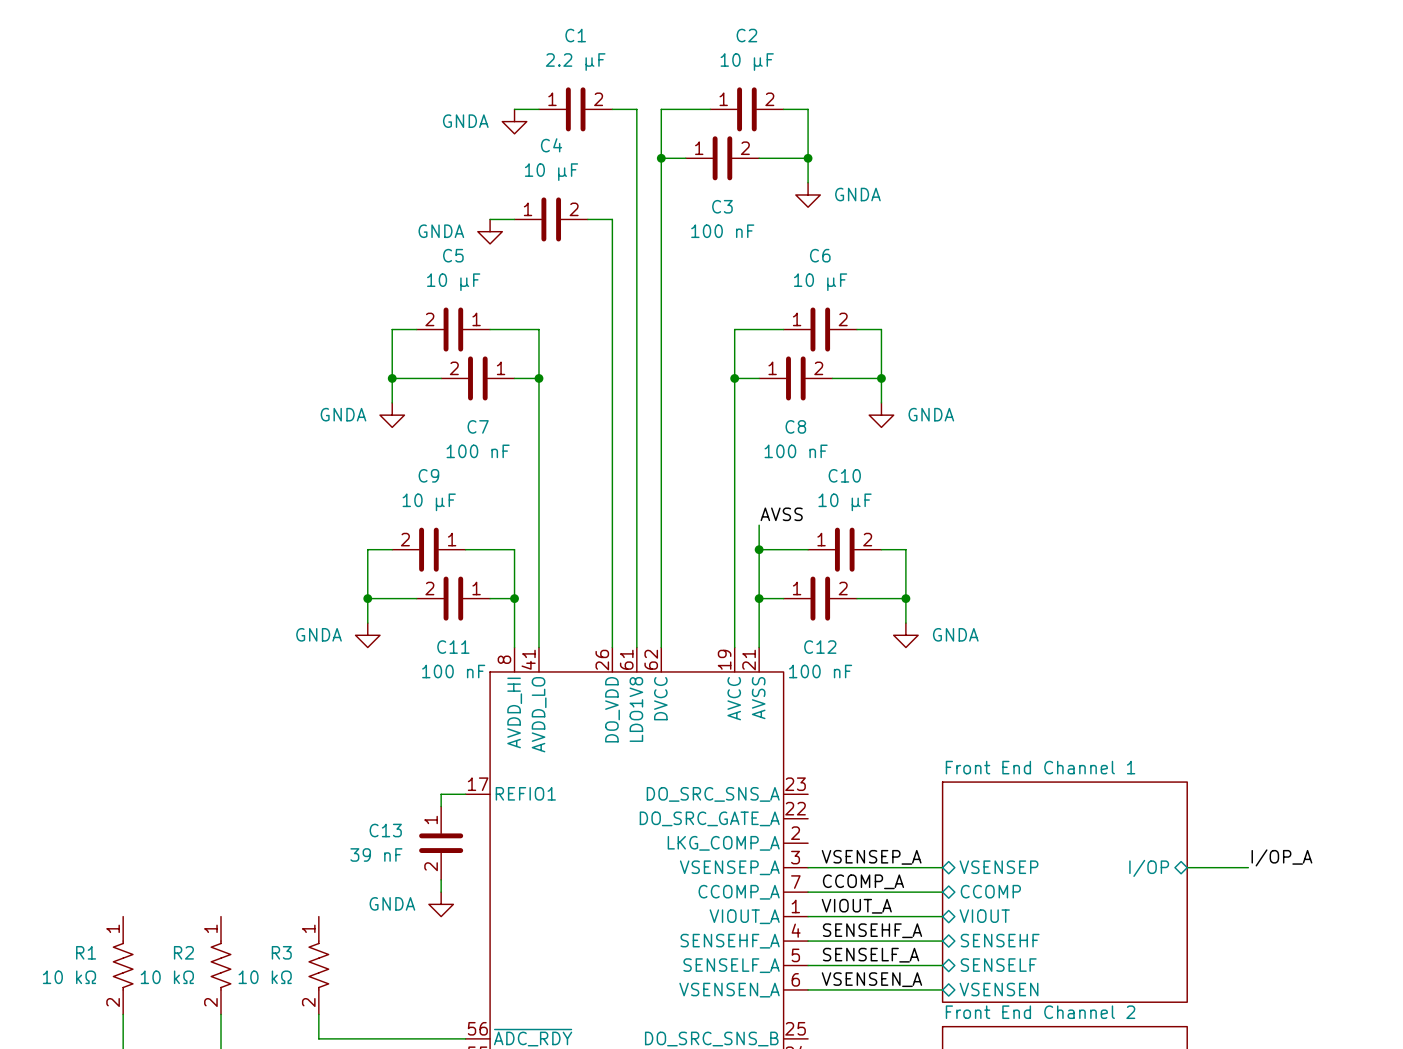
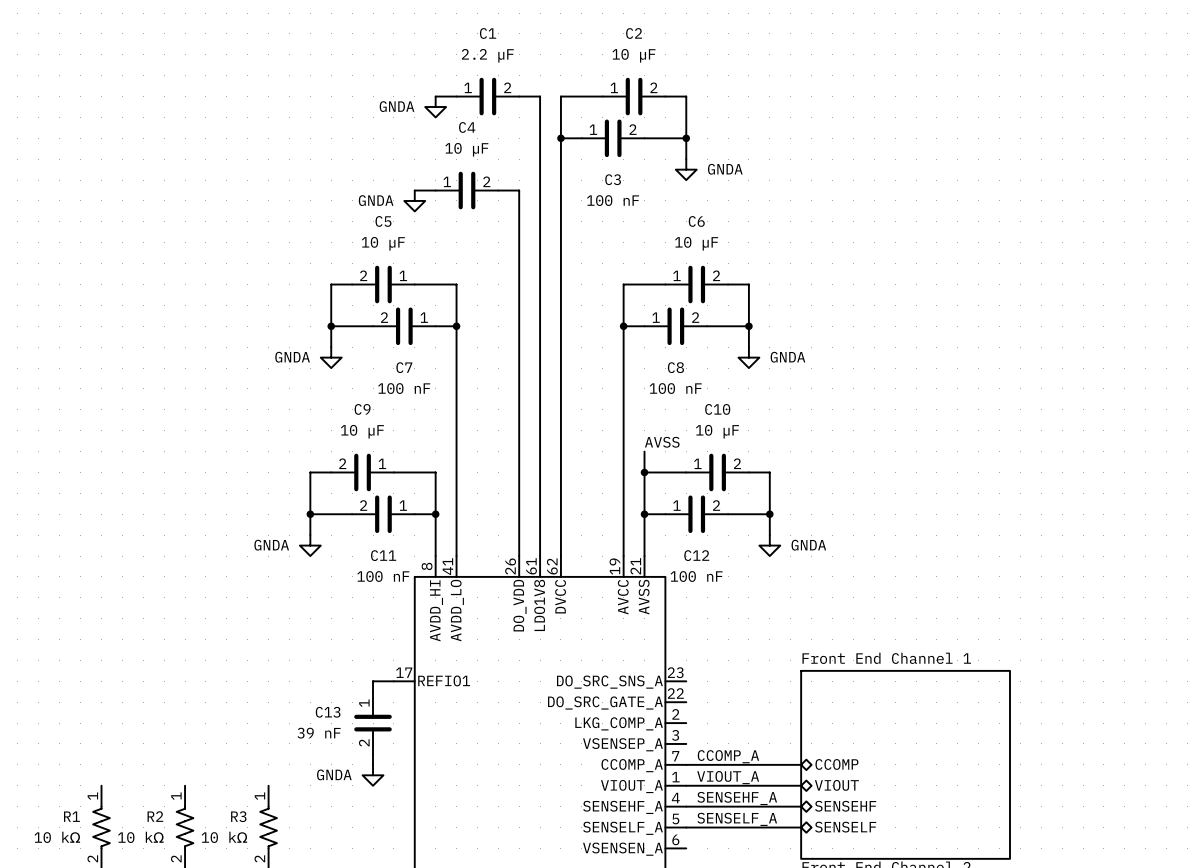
label: VSENSEP_A (871, 857) -> none
label: I/OP_A (1281, 857) -> none
wire: (808, 867) (942, 867) -> none
sheet pin: VSENSEP (998, 867) -> none
wire: (1187, 867) (1248, 867) -> none
sheet pin: I/OP (1149, 868) -> none
label: VSENSEN_A (871, 979) -> none
wire: (808, 989) (942, 989) -> none
sheet pin: VSENSEN (998, 989) -> none

